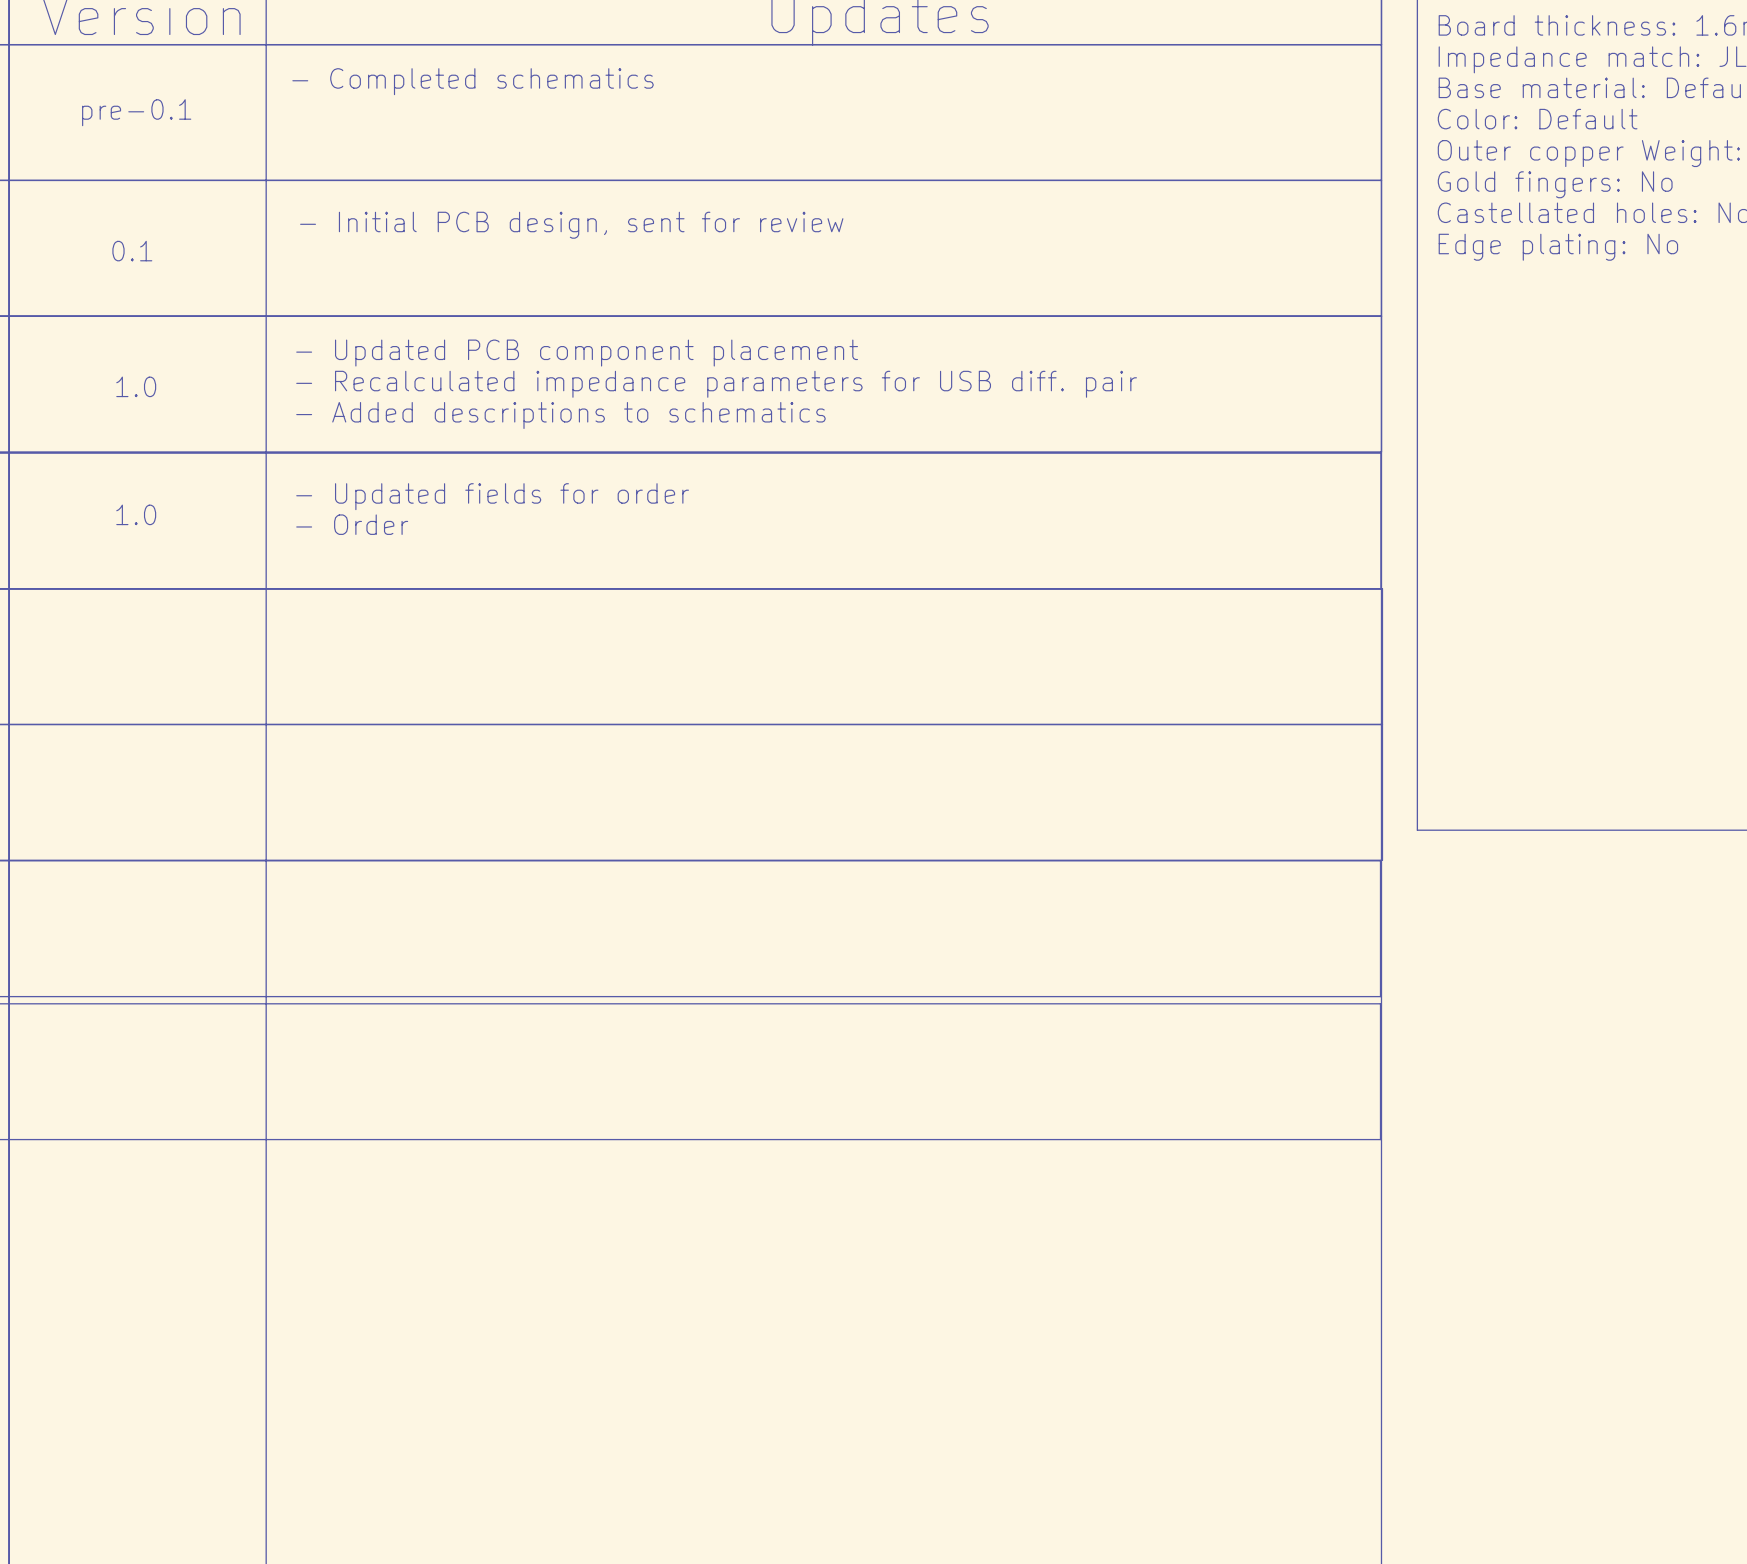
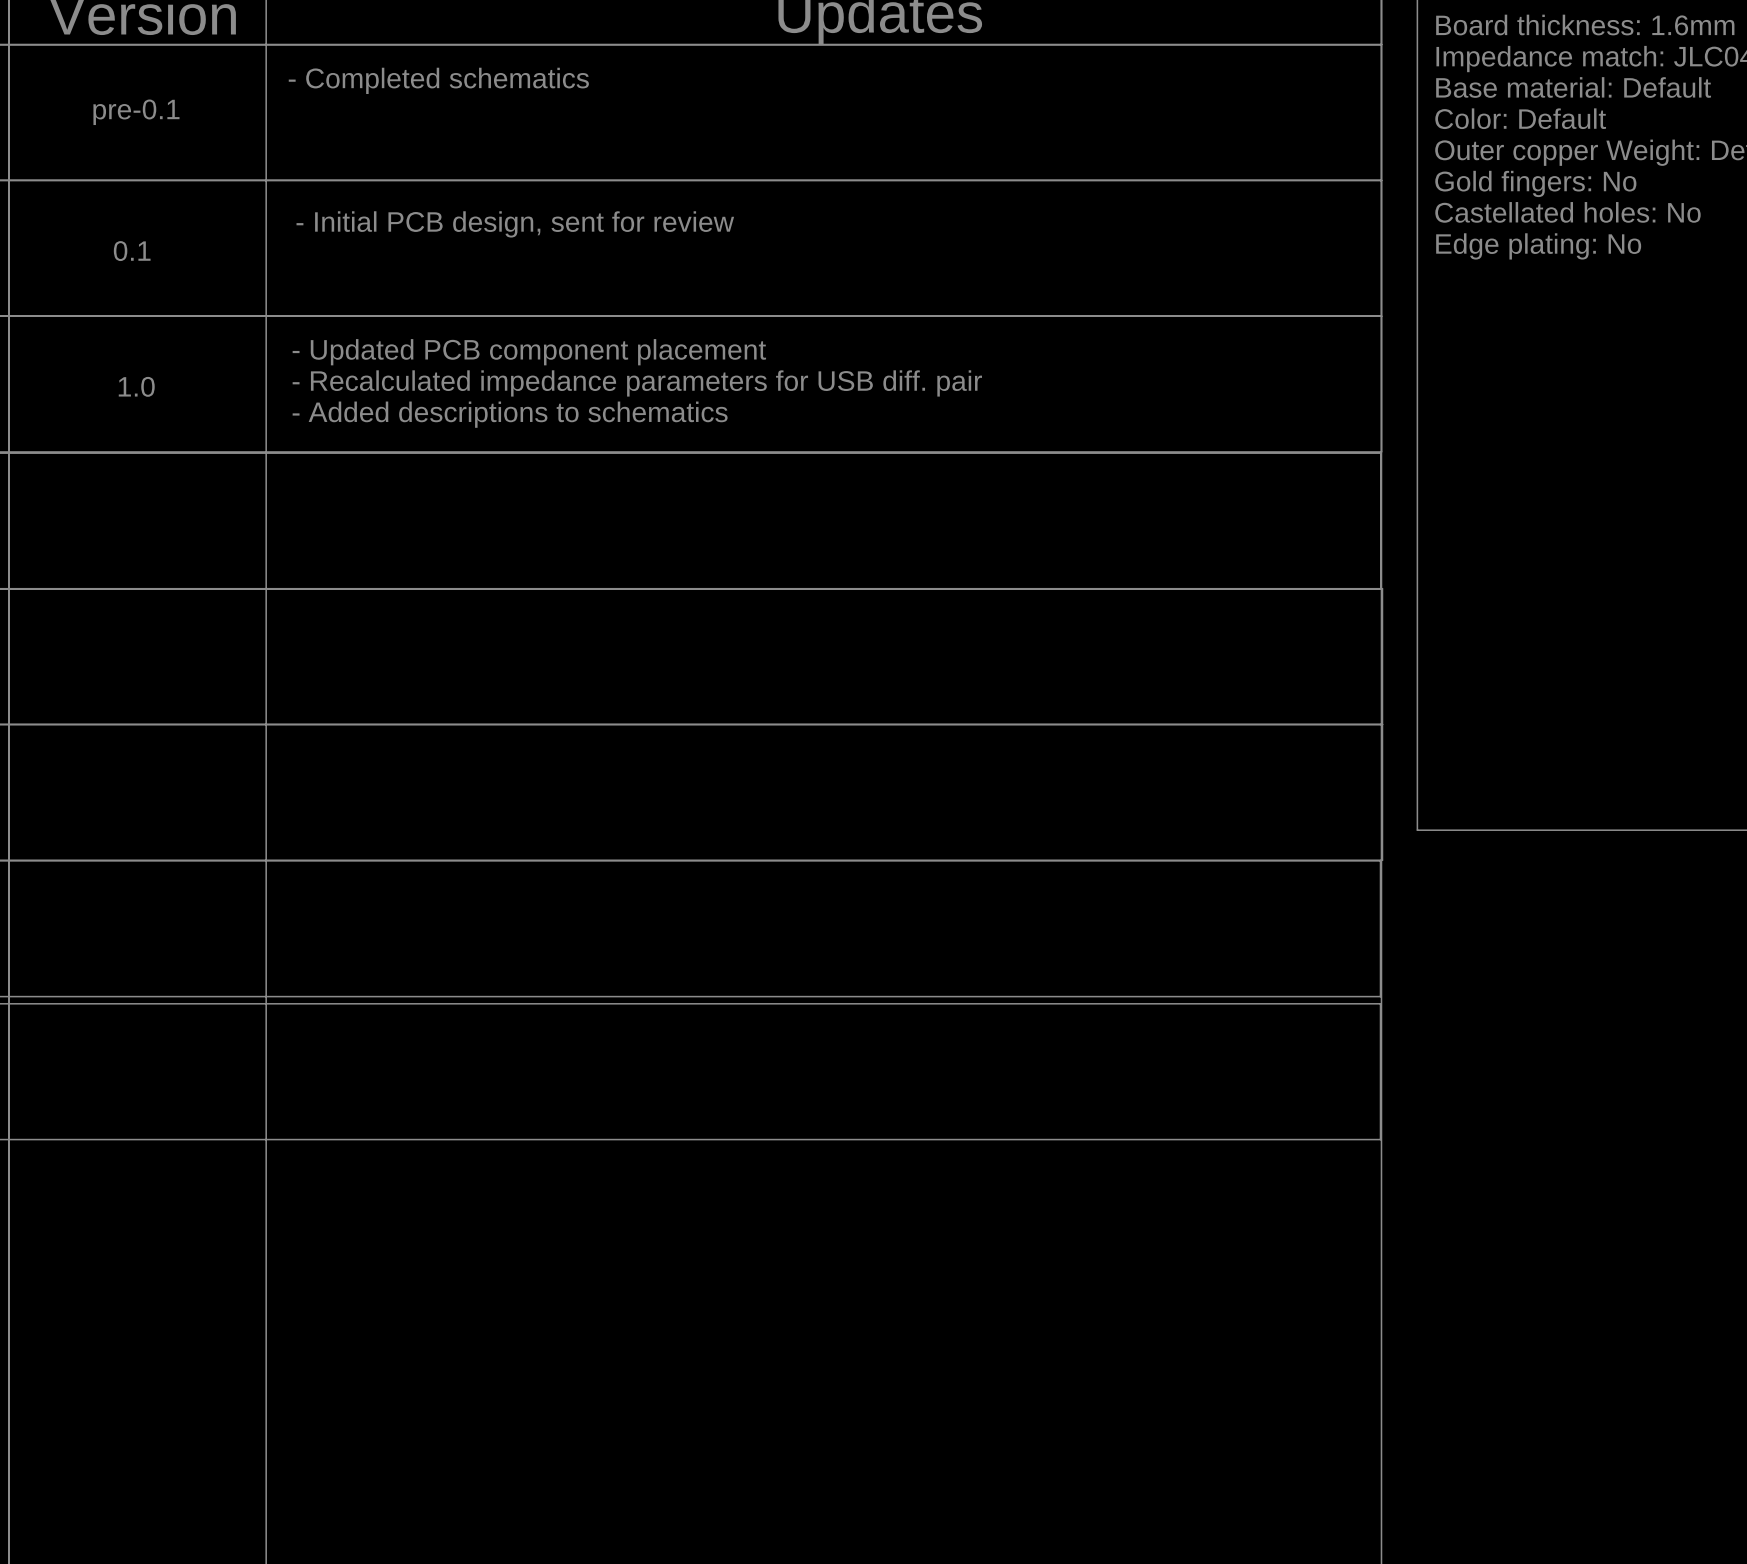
text: - Updated fields for order (492, 496) -> none
text: 1.0 (136, 514) -> none
text: - Order (352, 524) -> none

